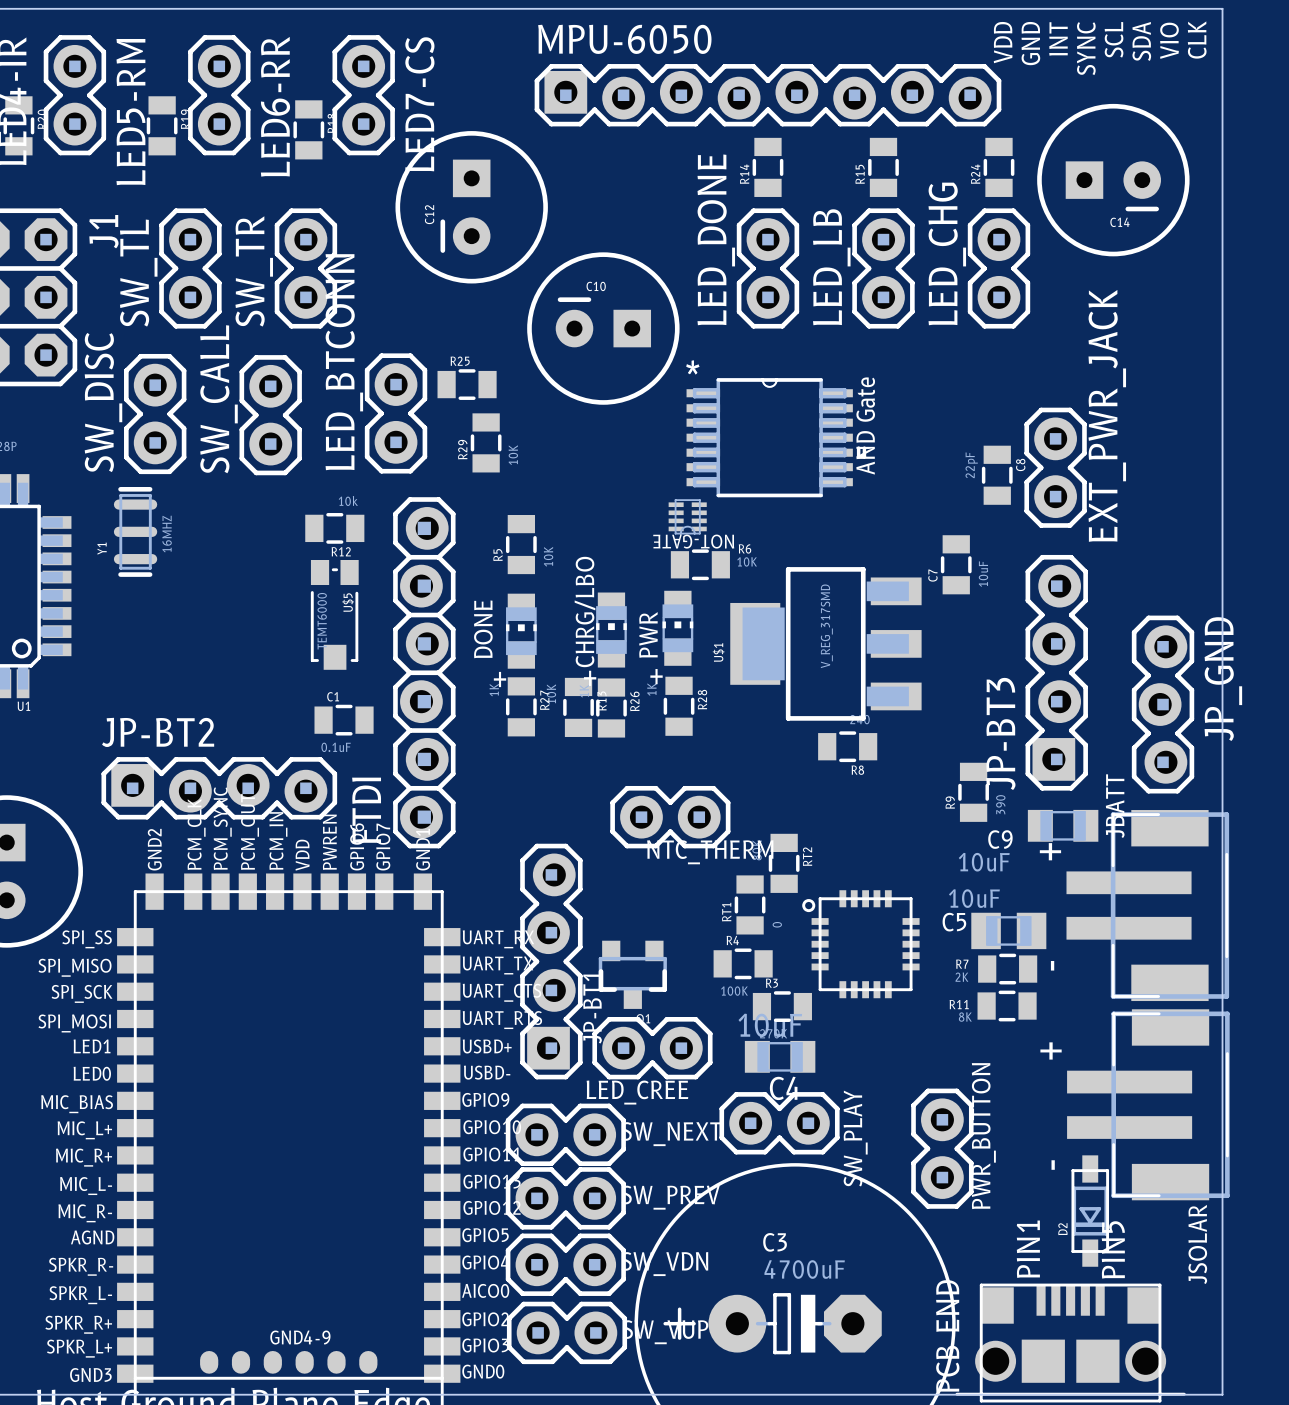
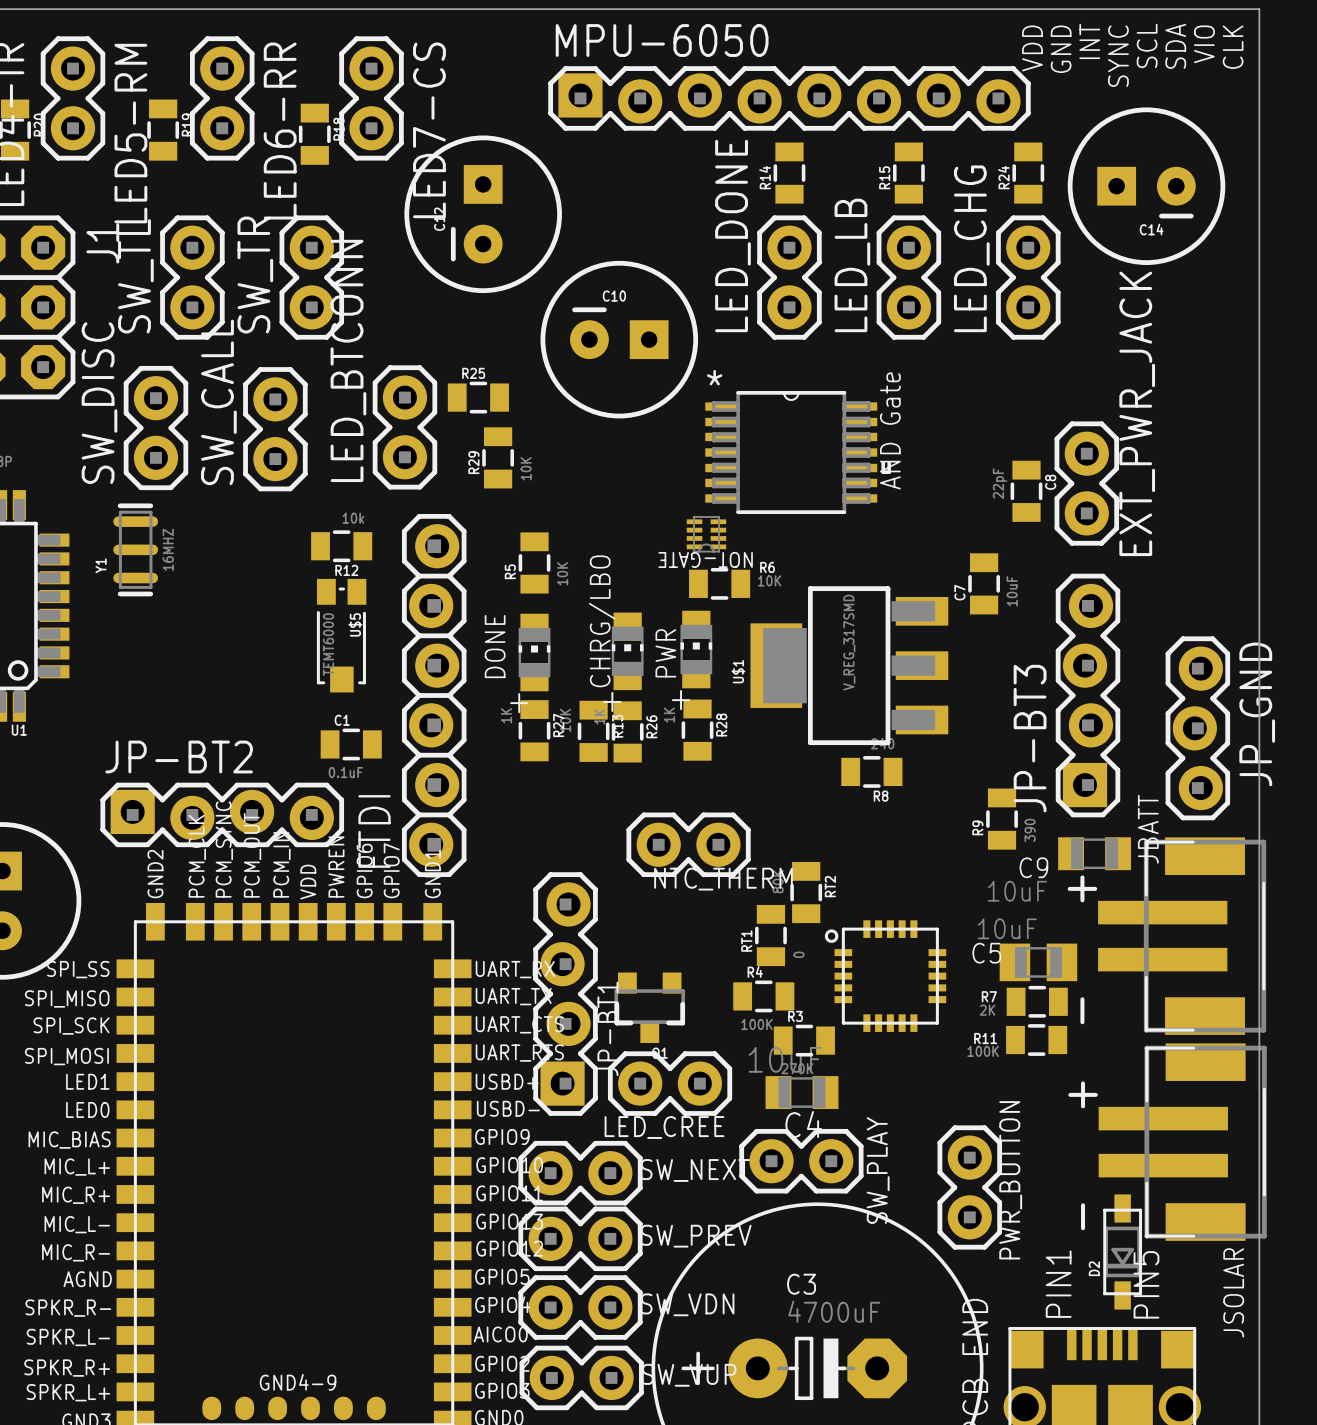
R11 value: 8K (965, 1017) -> 100K (983, 1051)

